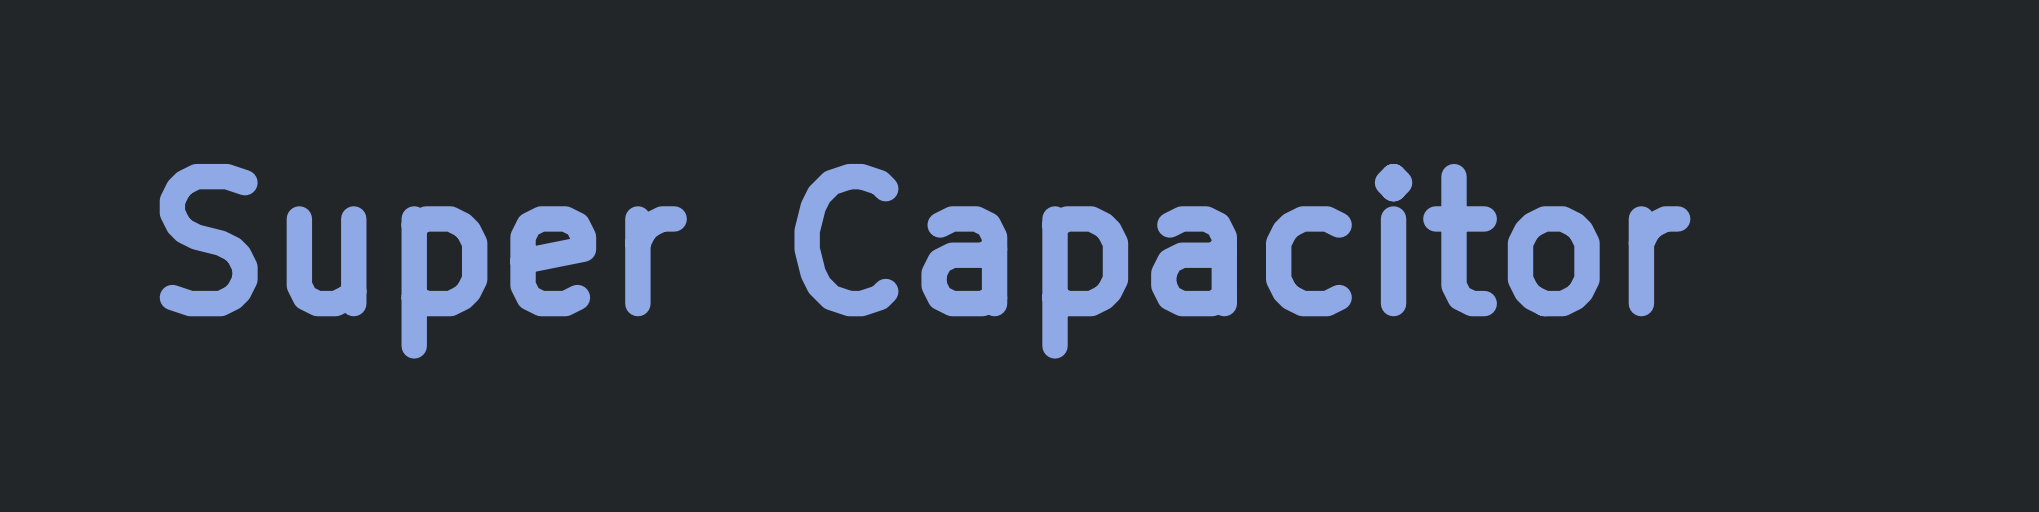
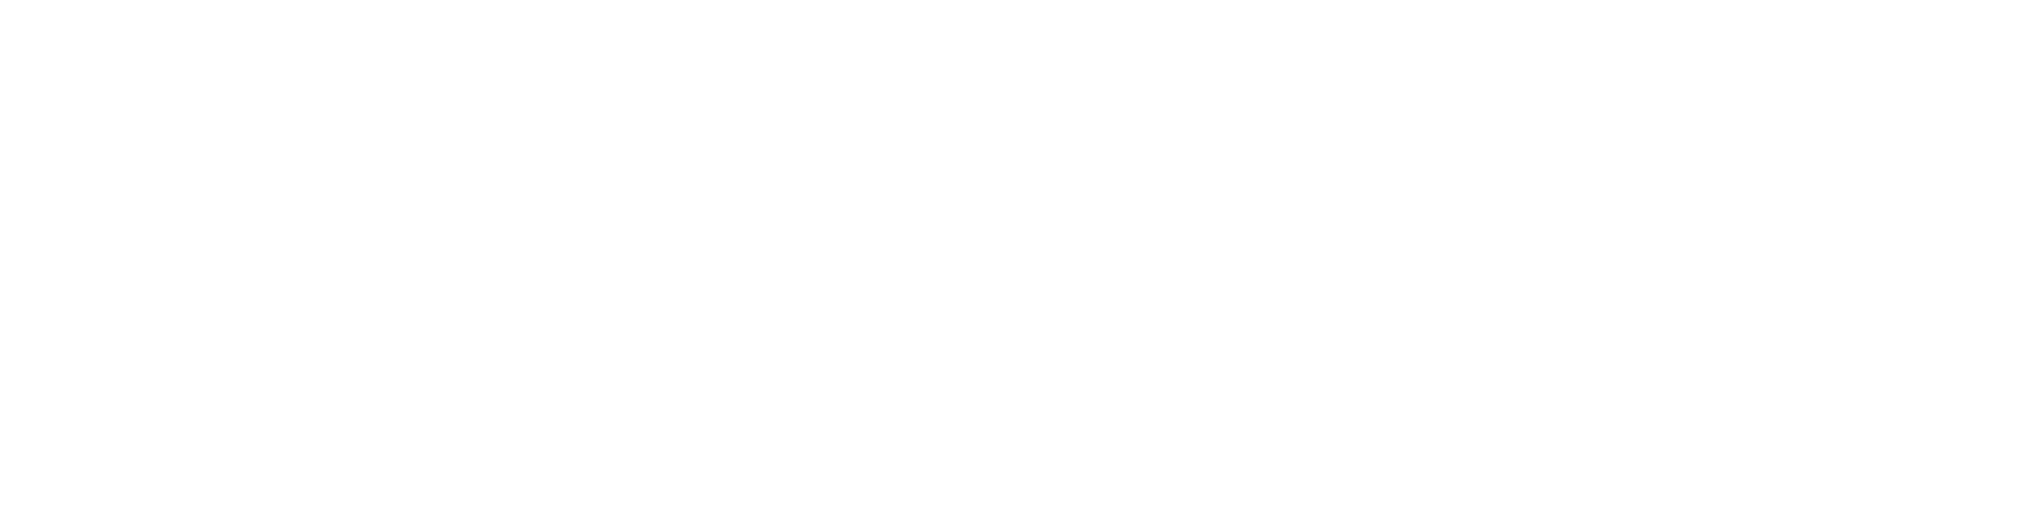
text: Super Capacitor (925, 261) -> none

